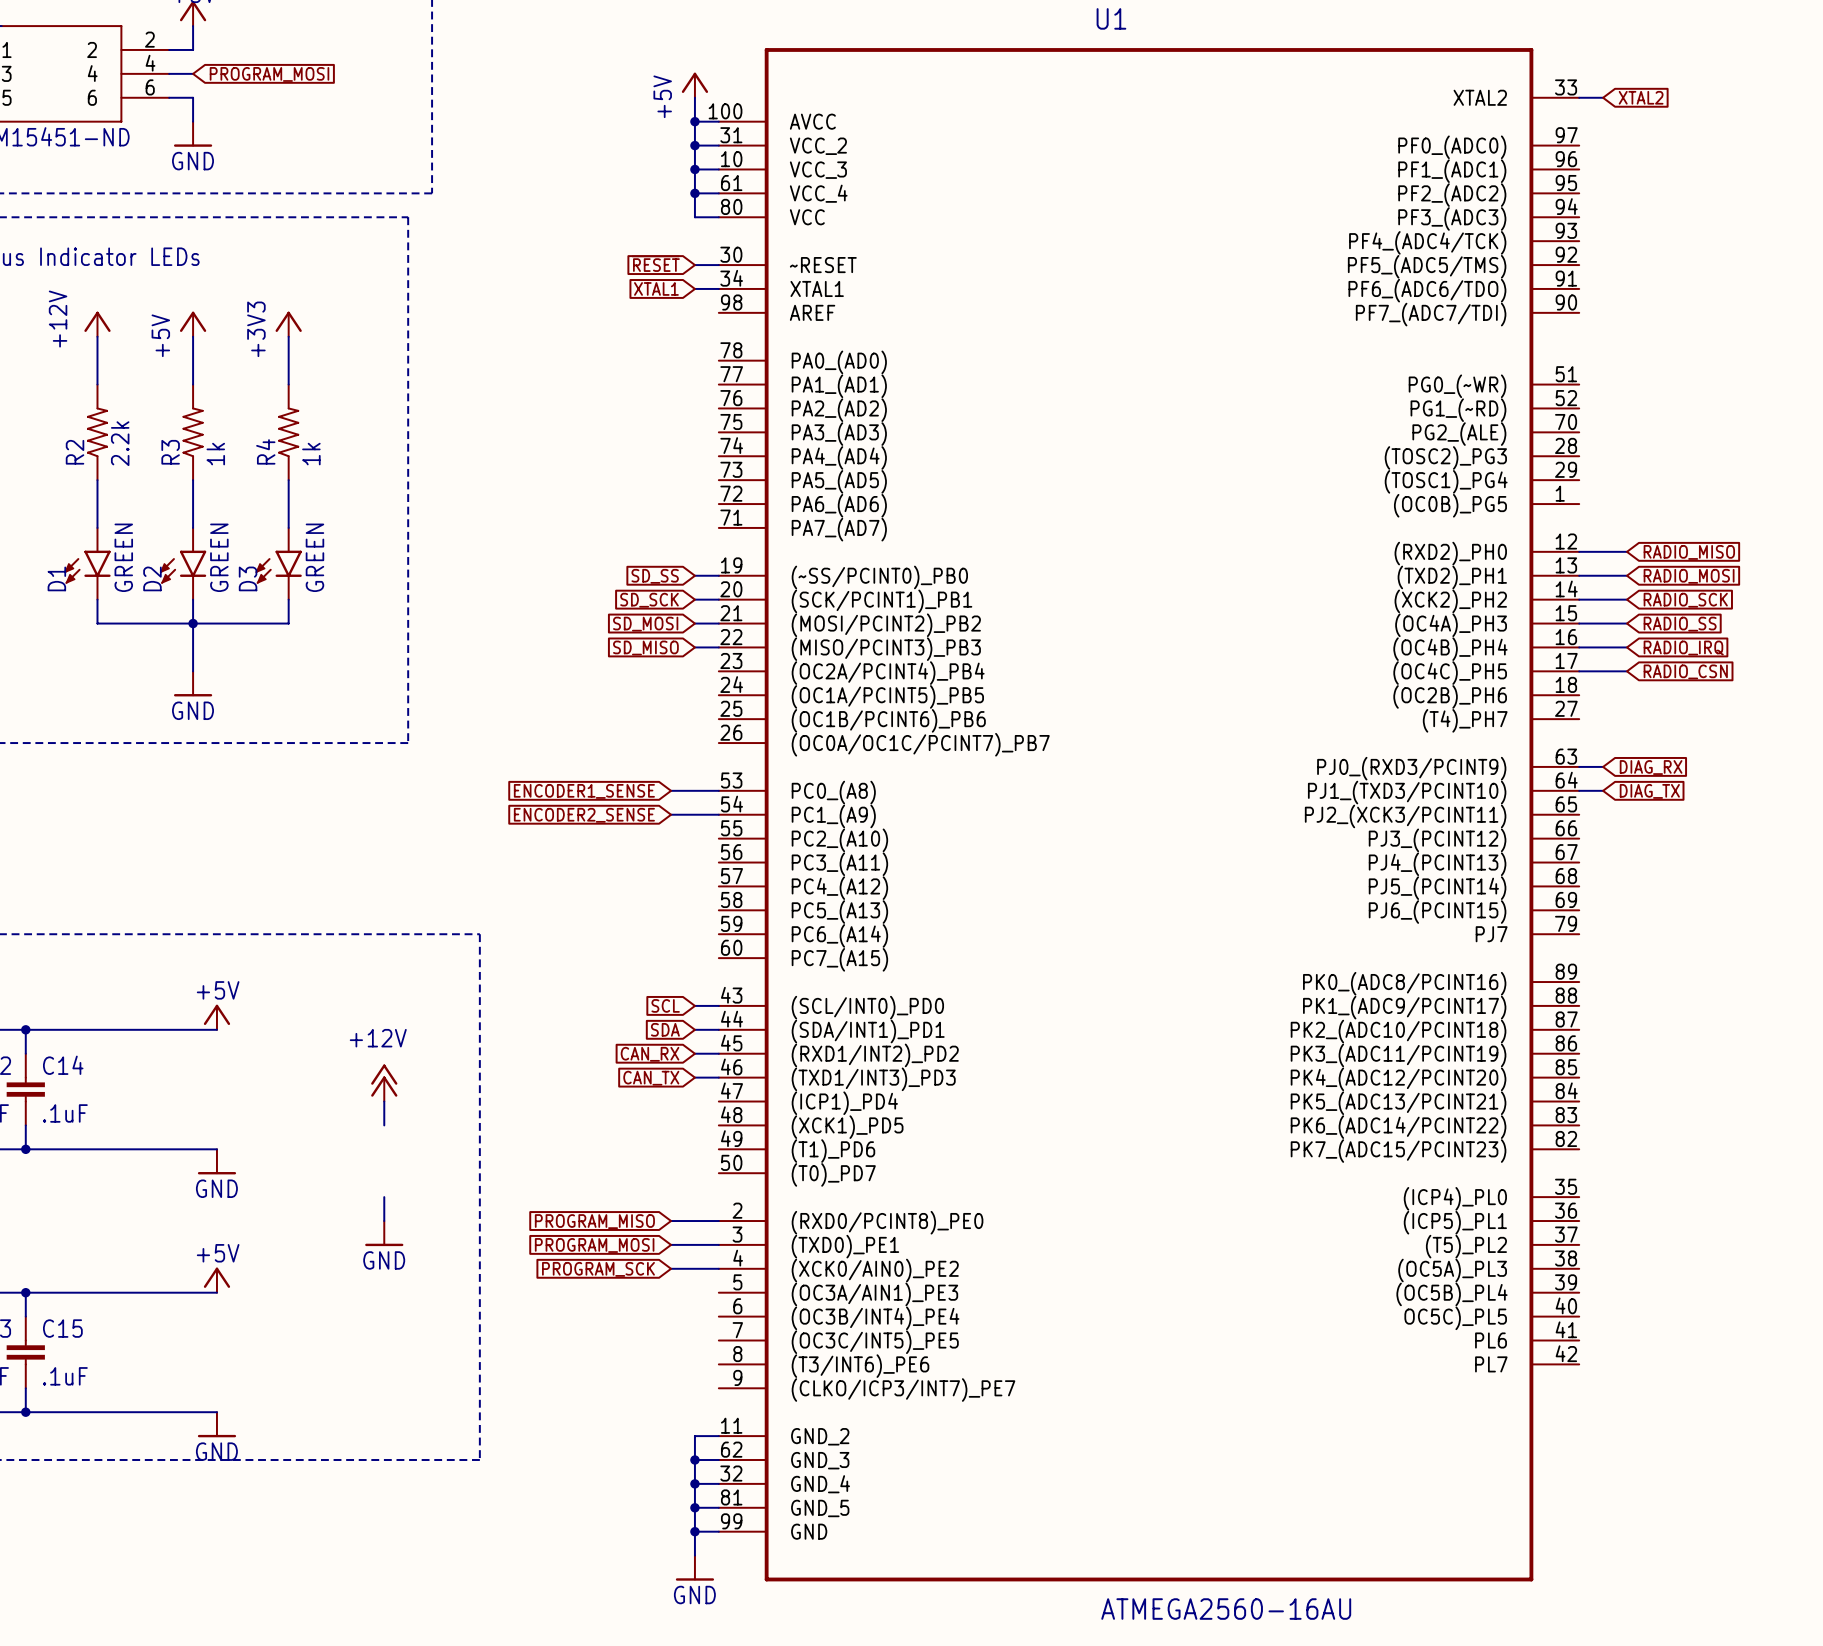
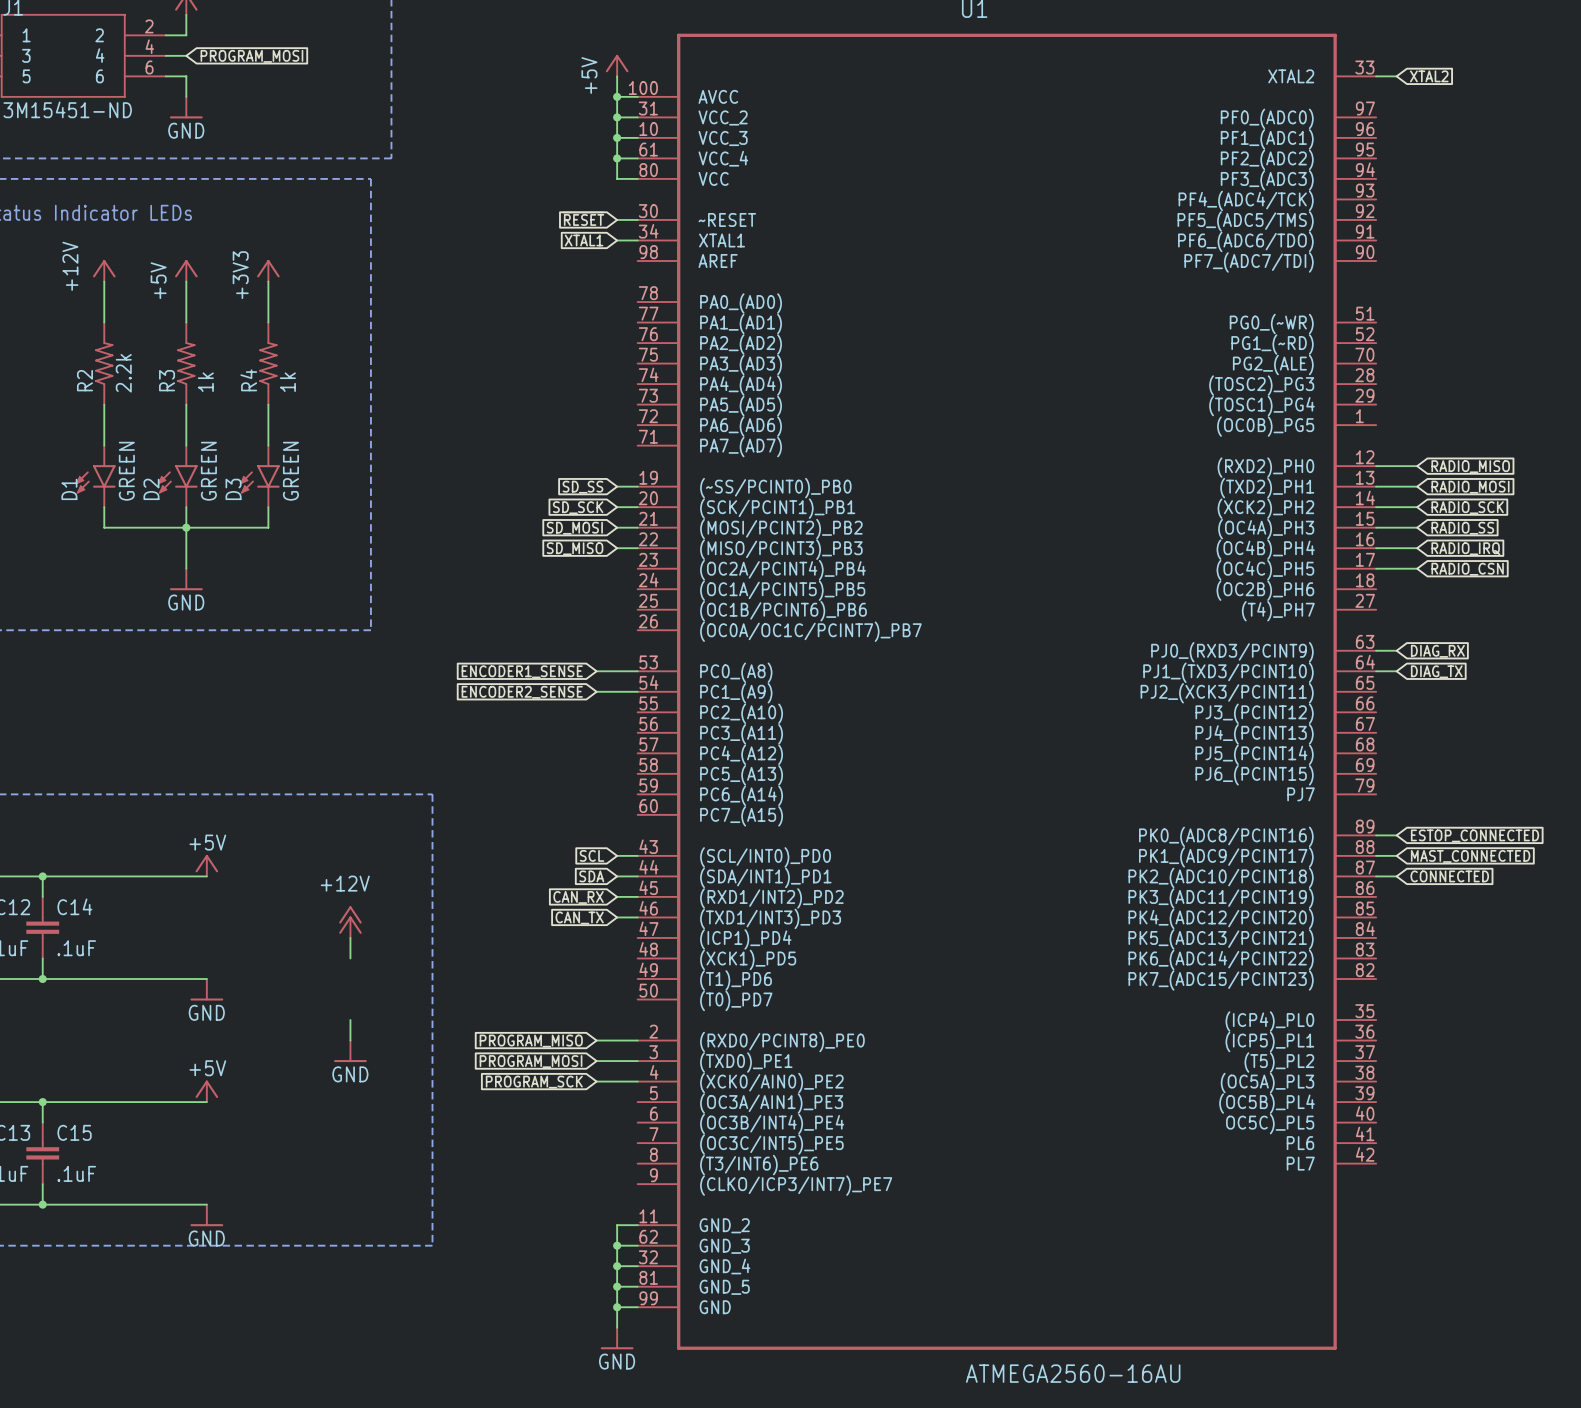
wire: none -> (1376, 835) (1396, 835)
global label: none -> ESTOP_CONNECTED (1475, 835)
wire: none -> (1376, 855) (1396, 855)
global label: none -> MAST_CONNECTED (1470, 856)
wire: none -> (1376, 876) (1396, 876)
global label: none -> CONNECTED (1449, 876)

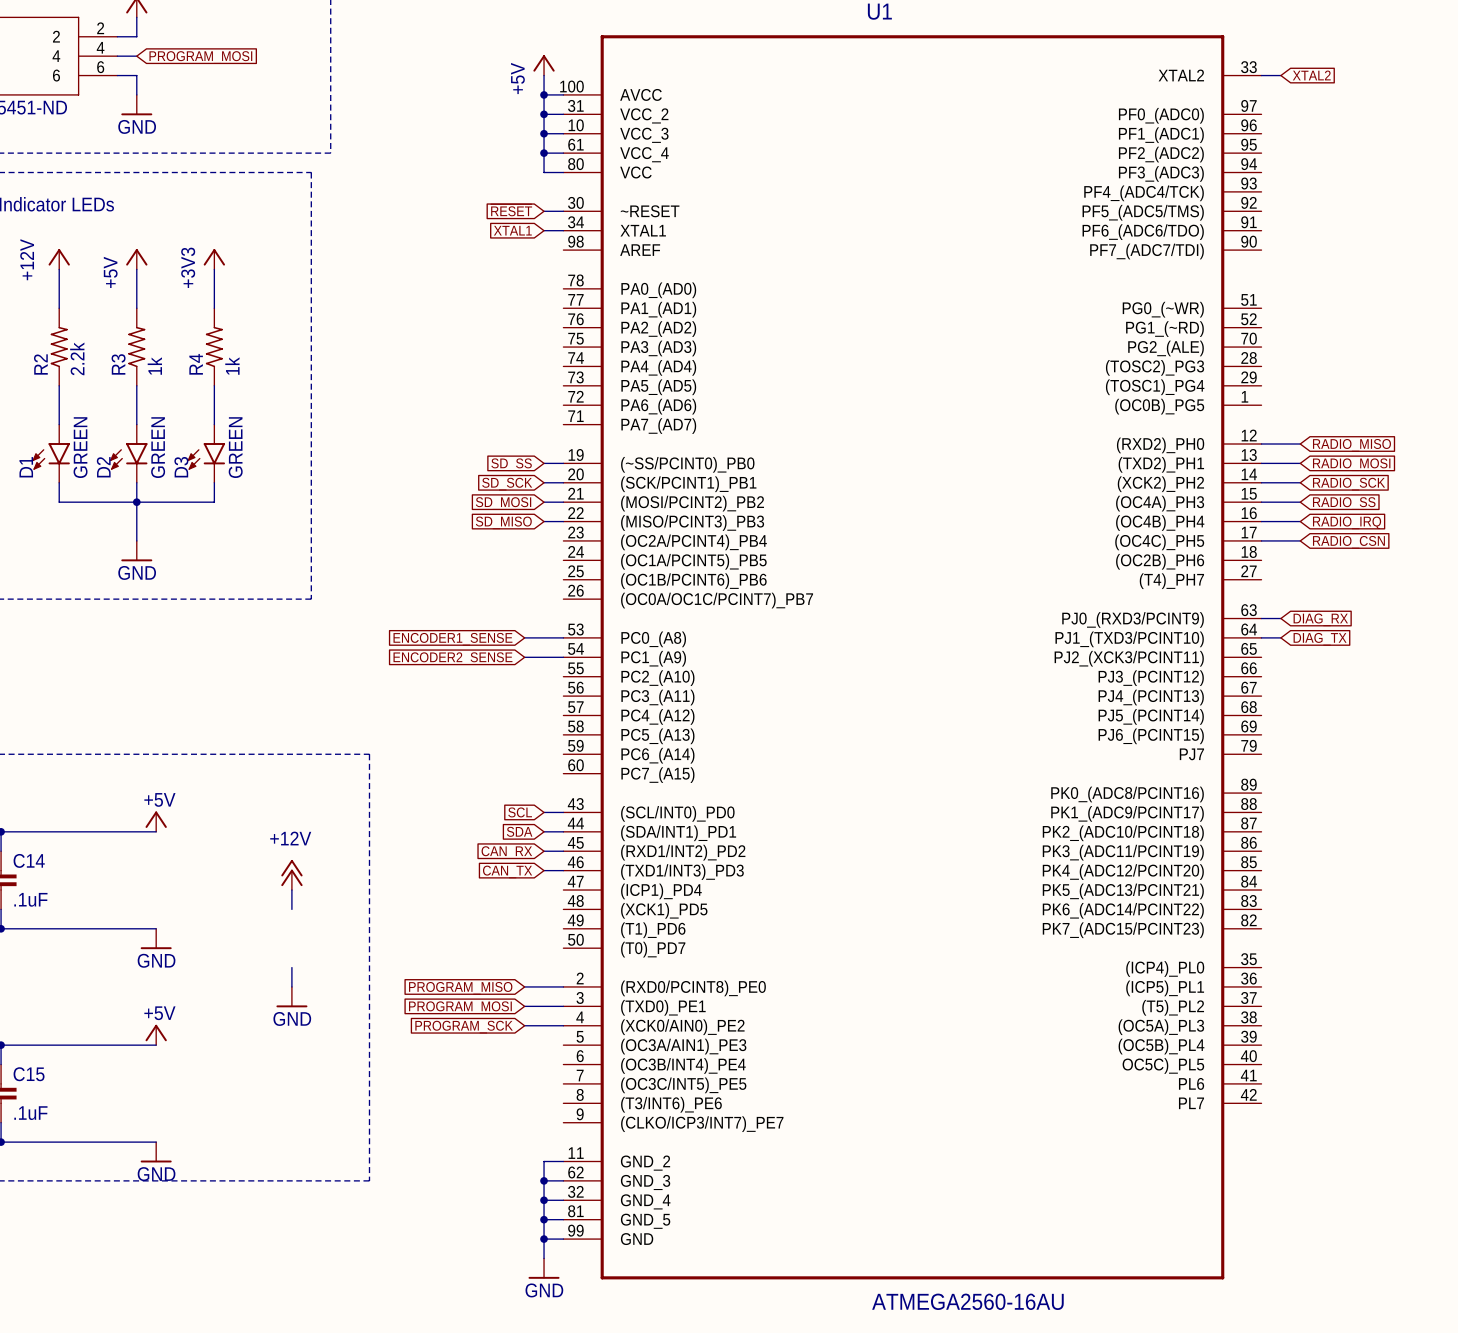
wire: (1376, 835) (1396, 835) -> none
global label: ESTOP_CONNECTED (1475, 835) -> none
wire: (1376, 855) (1396, 855) -> none
global label: MAST_CONNECTED (1470, 856) -> none
wire: (1376, 876) (1396, 876) -> none
global label: CONNECTED (1449, 876) -> none

